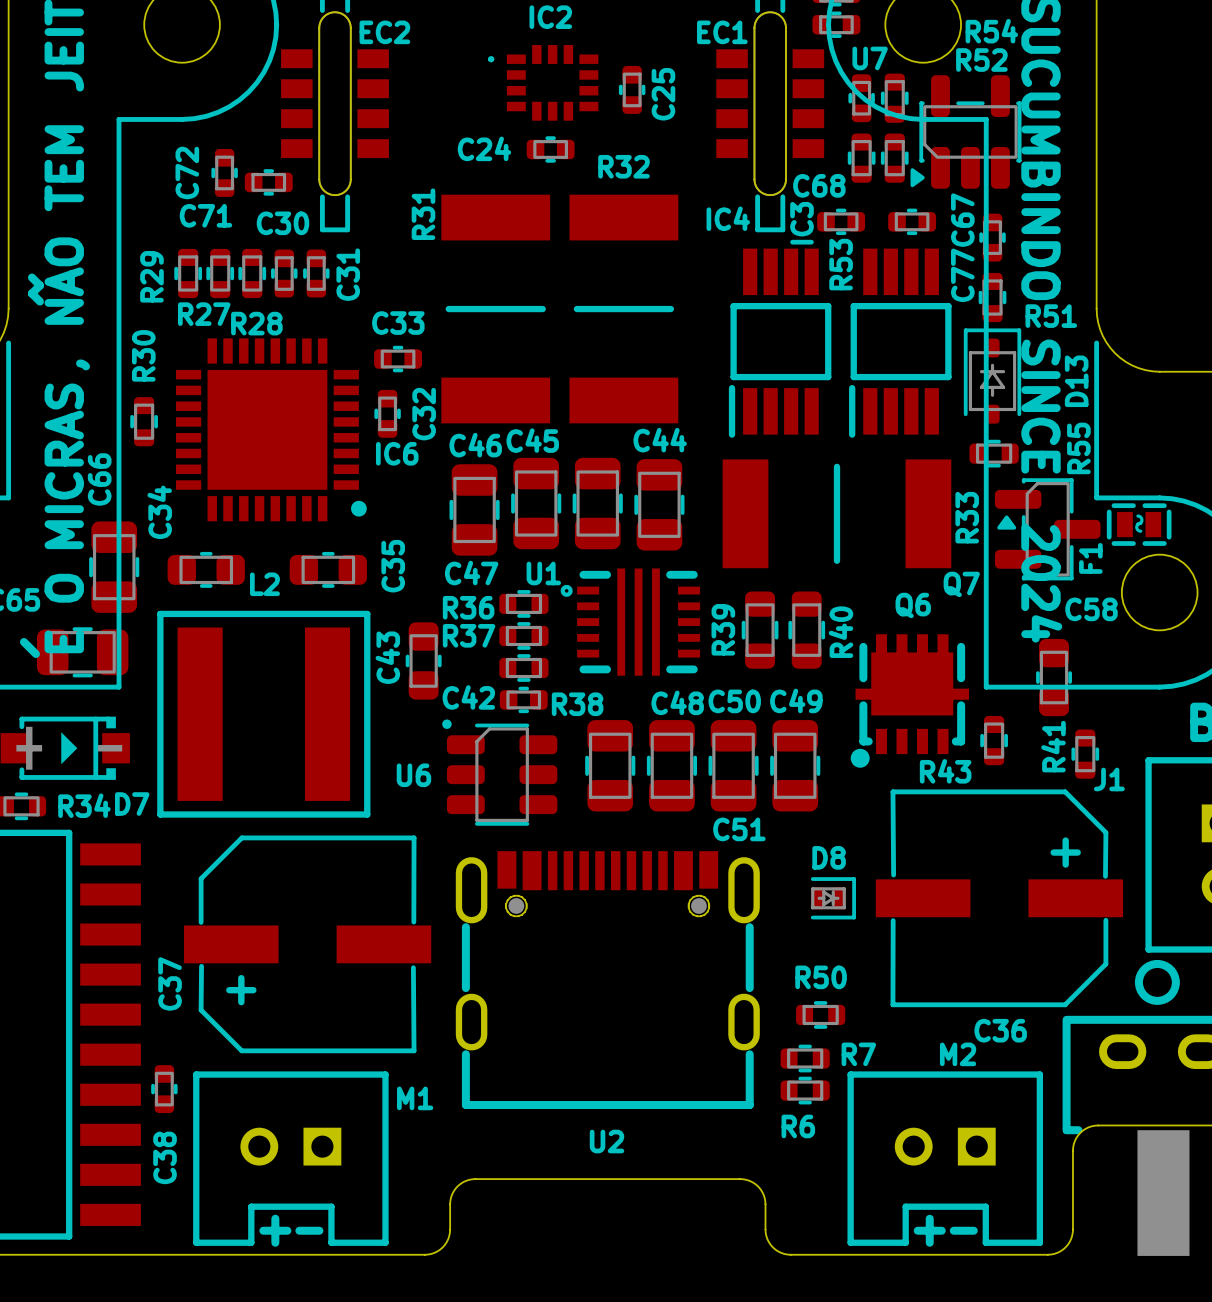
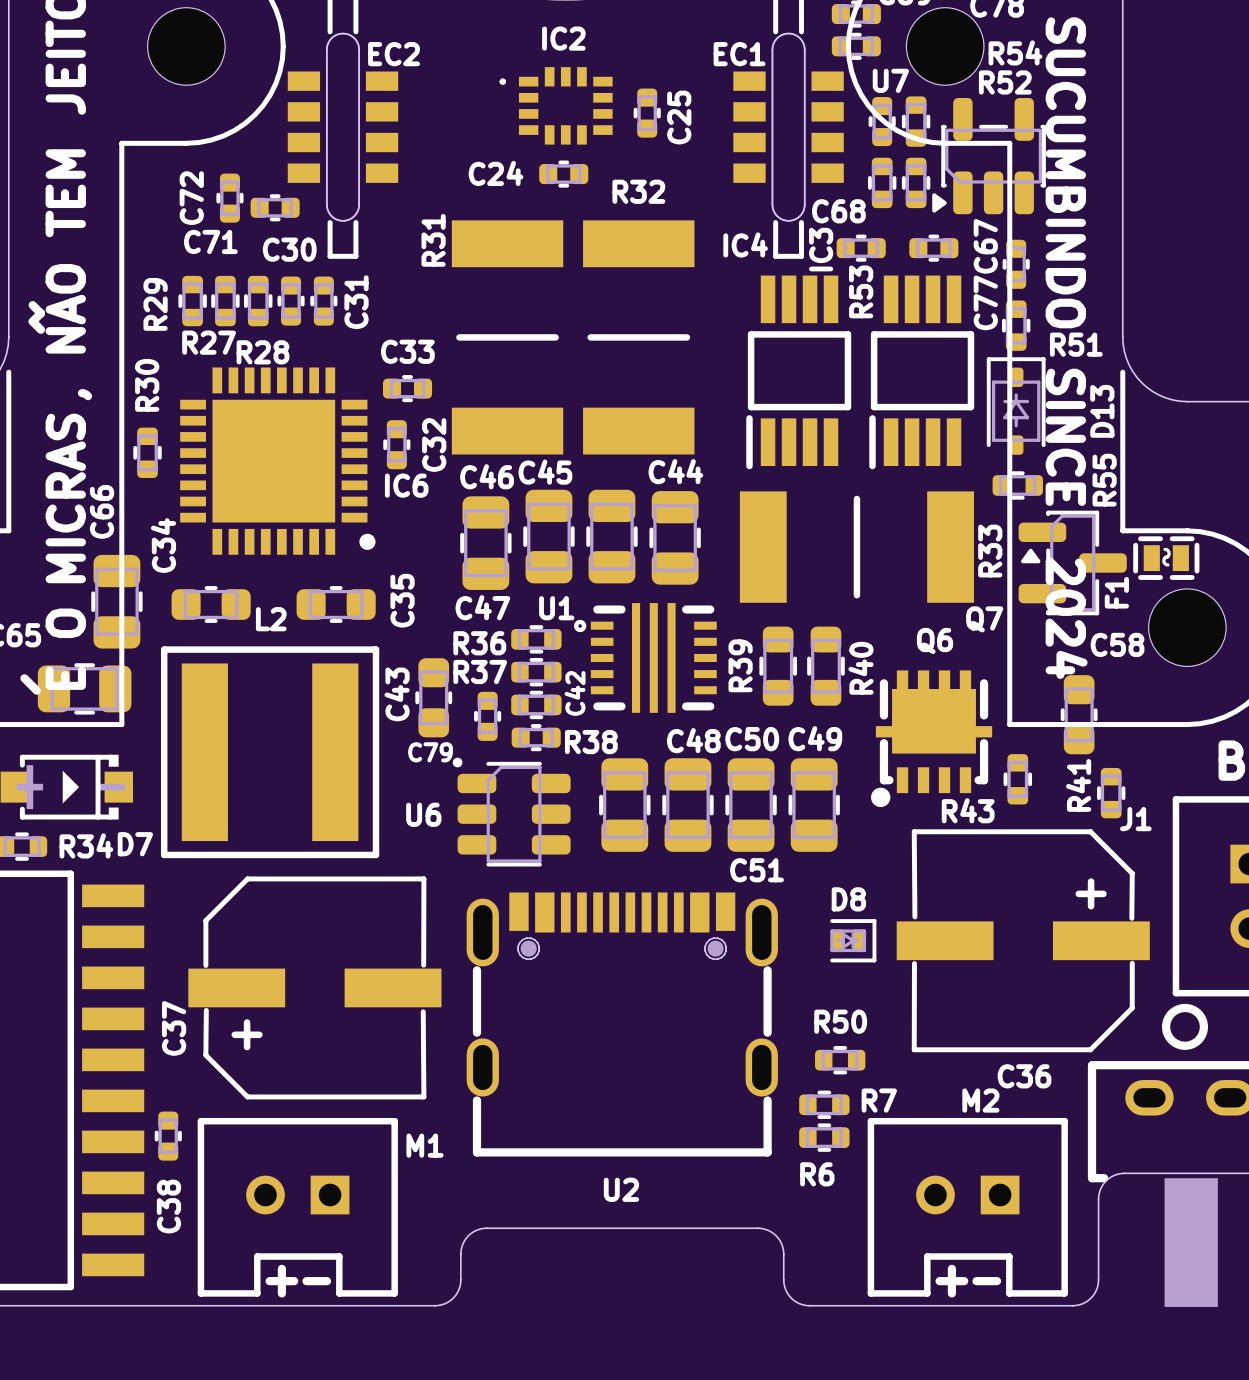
C79: none -> (487, 716)
C42 name rotation: 0° (468, 697) -> 90° counterclockwise (575, 693)
C42 name position: C42 (468, 697) -> C42 (575, 693)

